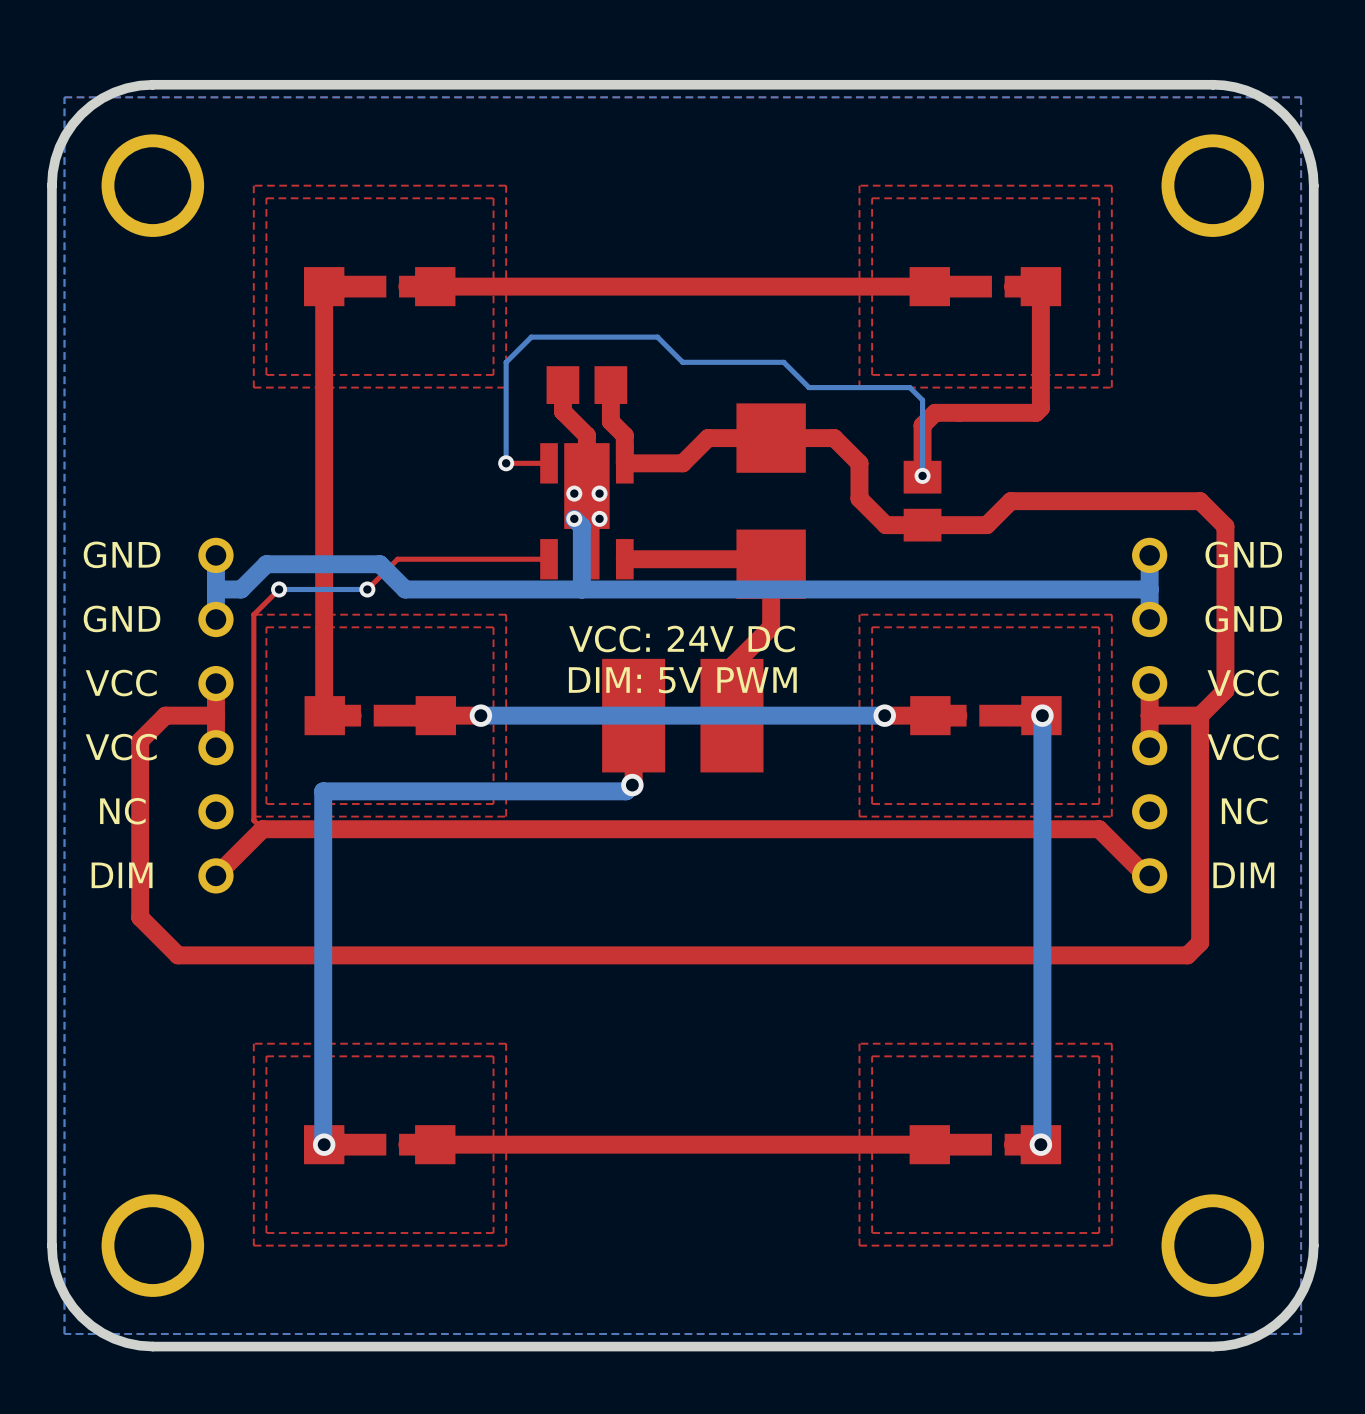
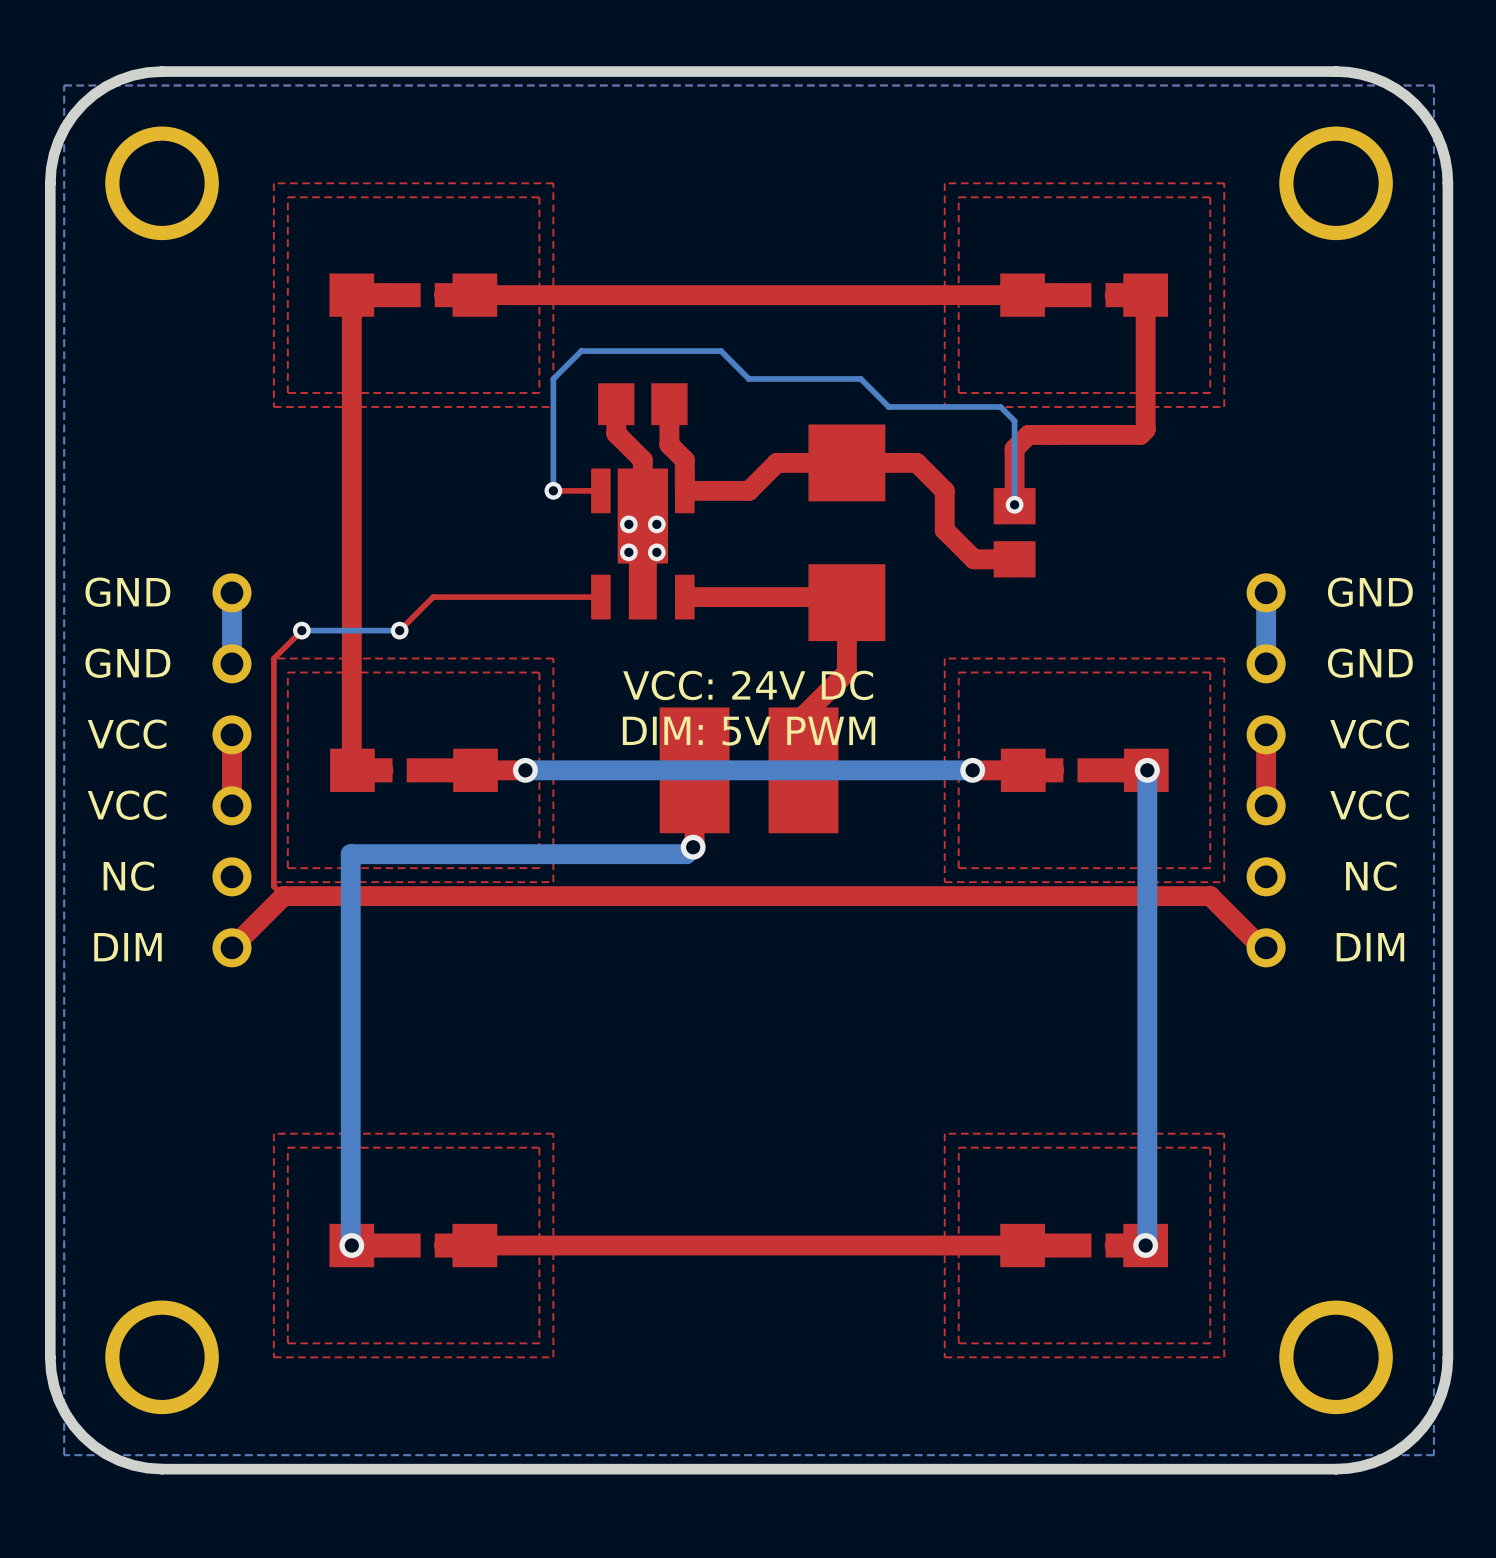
bottom track: (574, 518) (581, 526) (581, 589) -> none
top track: (922, 525) (986, 525) (1010, 501) (1200, 501) (1225, 526) (1225, 690) (1200, 715) -> none
bottom track: (1149, 589) (405, 589) (380, 564) (266, 564) (241, 589) (215, 589) -> none
top track: (1200, 715) (1149, 715) -> none
top track: (1200, 715) (1200, 942) (1187, 955) (178, 955) (140, 917) (140, 740) (165, 715) (215, 715) -> none

